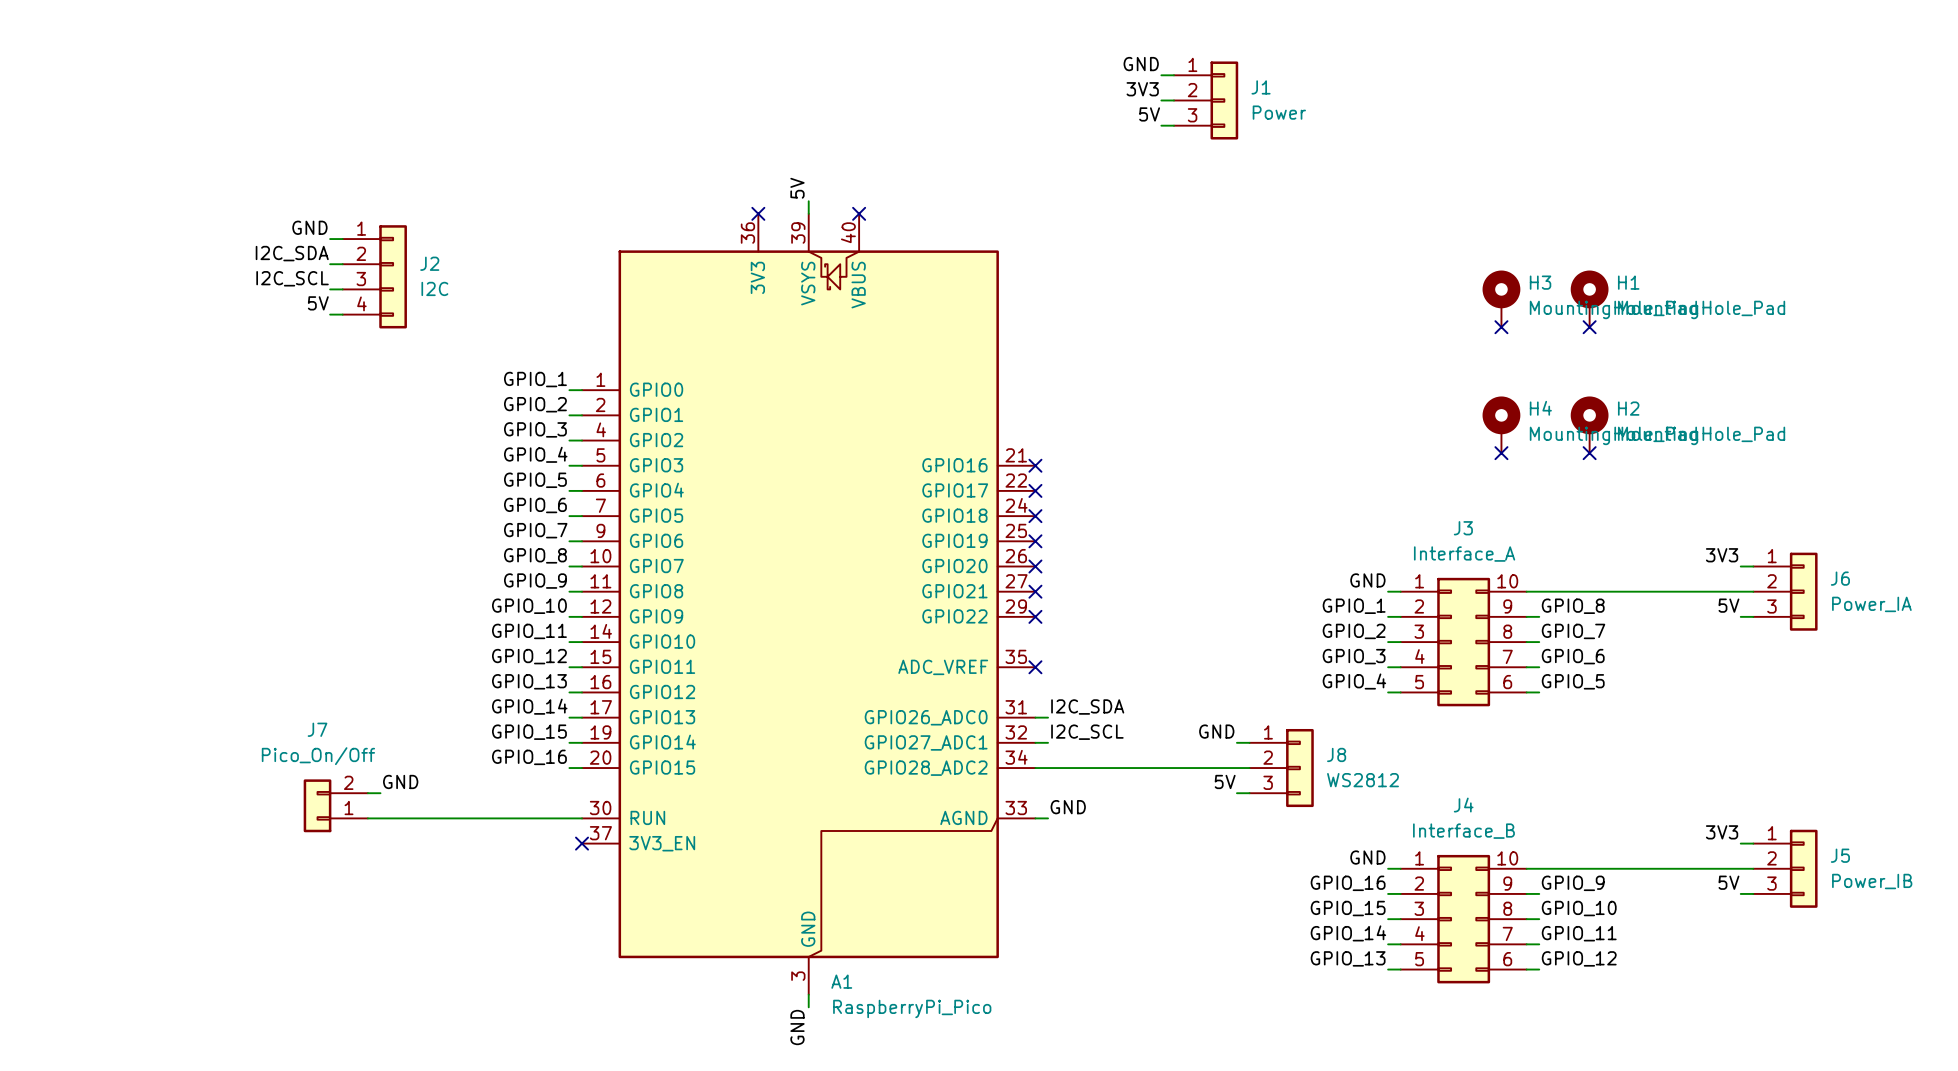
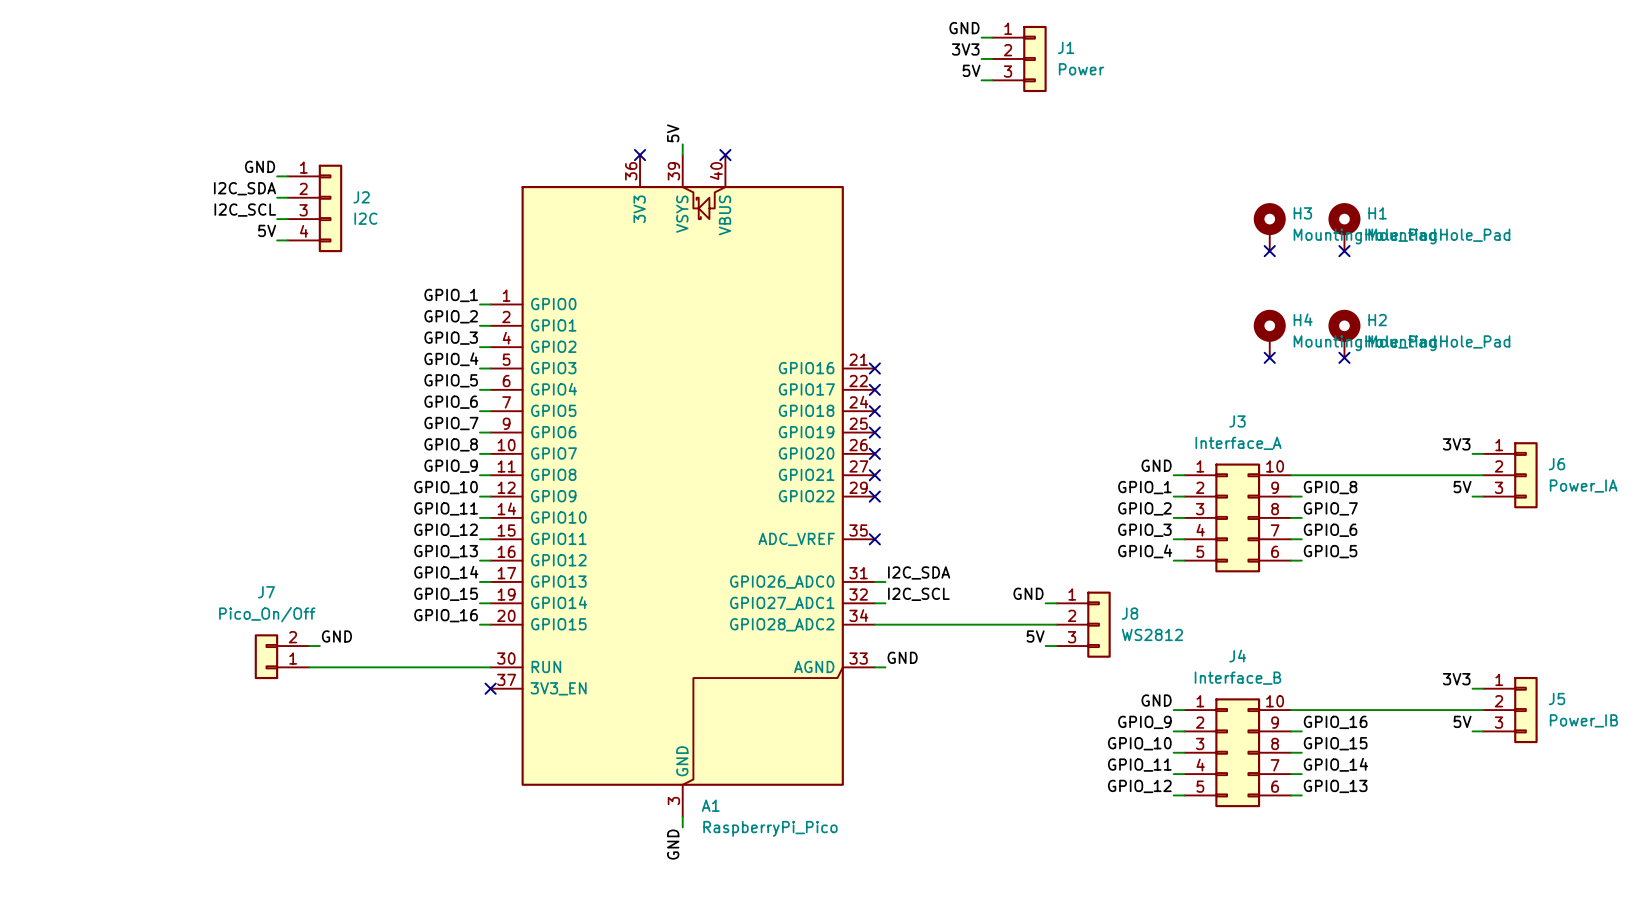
label: GPIO_16 (1348, 883) -> GPIO_9 (1144, 722)
label: GPIO_9 (1573, 883) -> GPIO_16 (1335, 722)
label: GPIO_15 (1348, 908) -> GPIO_10 (1139, 743)
label: GPIO_10 (1579, 908) -> GPIO_15 (1335, 743)
label: GPIO_14 (1348, 933) -> GPIO_11 (1139, 765)
label: GPIO_11 (1579, 933) -> GPIO_14 (1335, 764)
label: GPIO_13 (1348, 958) -> GPIO_12 (1139, 786)
label: GPIO_12 (1579, 958) -> GPIO_13 (1335, 786)

